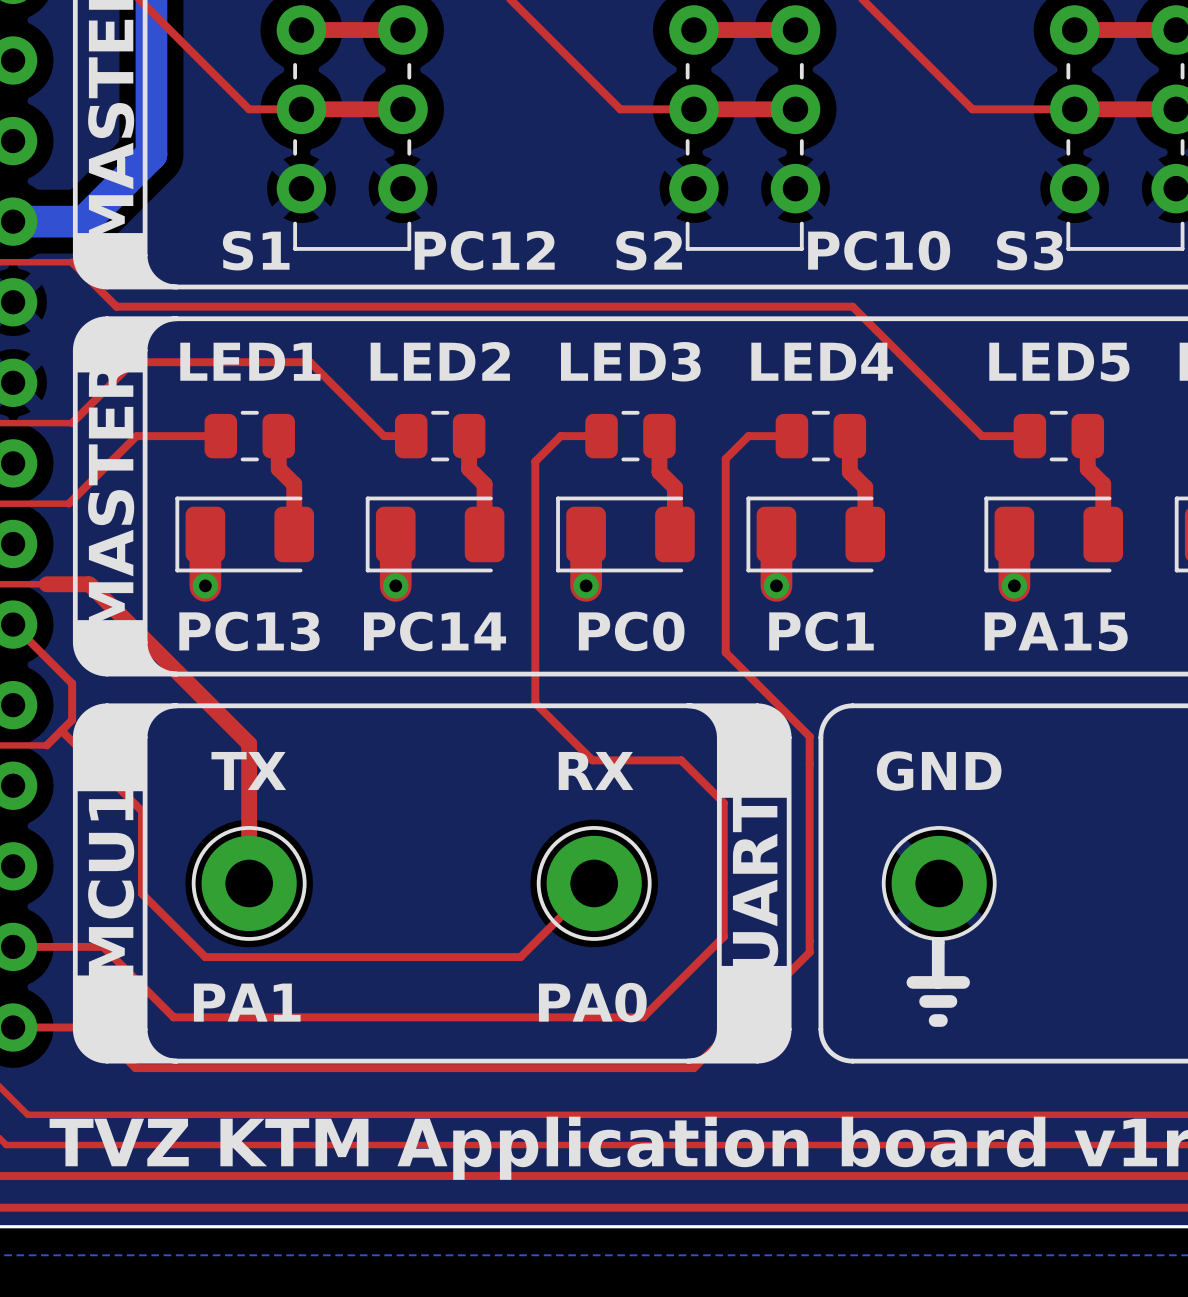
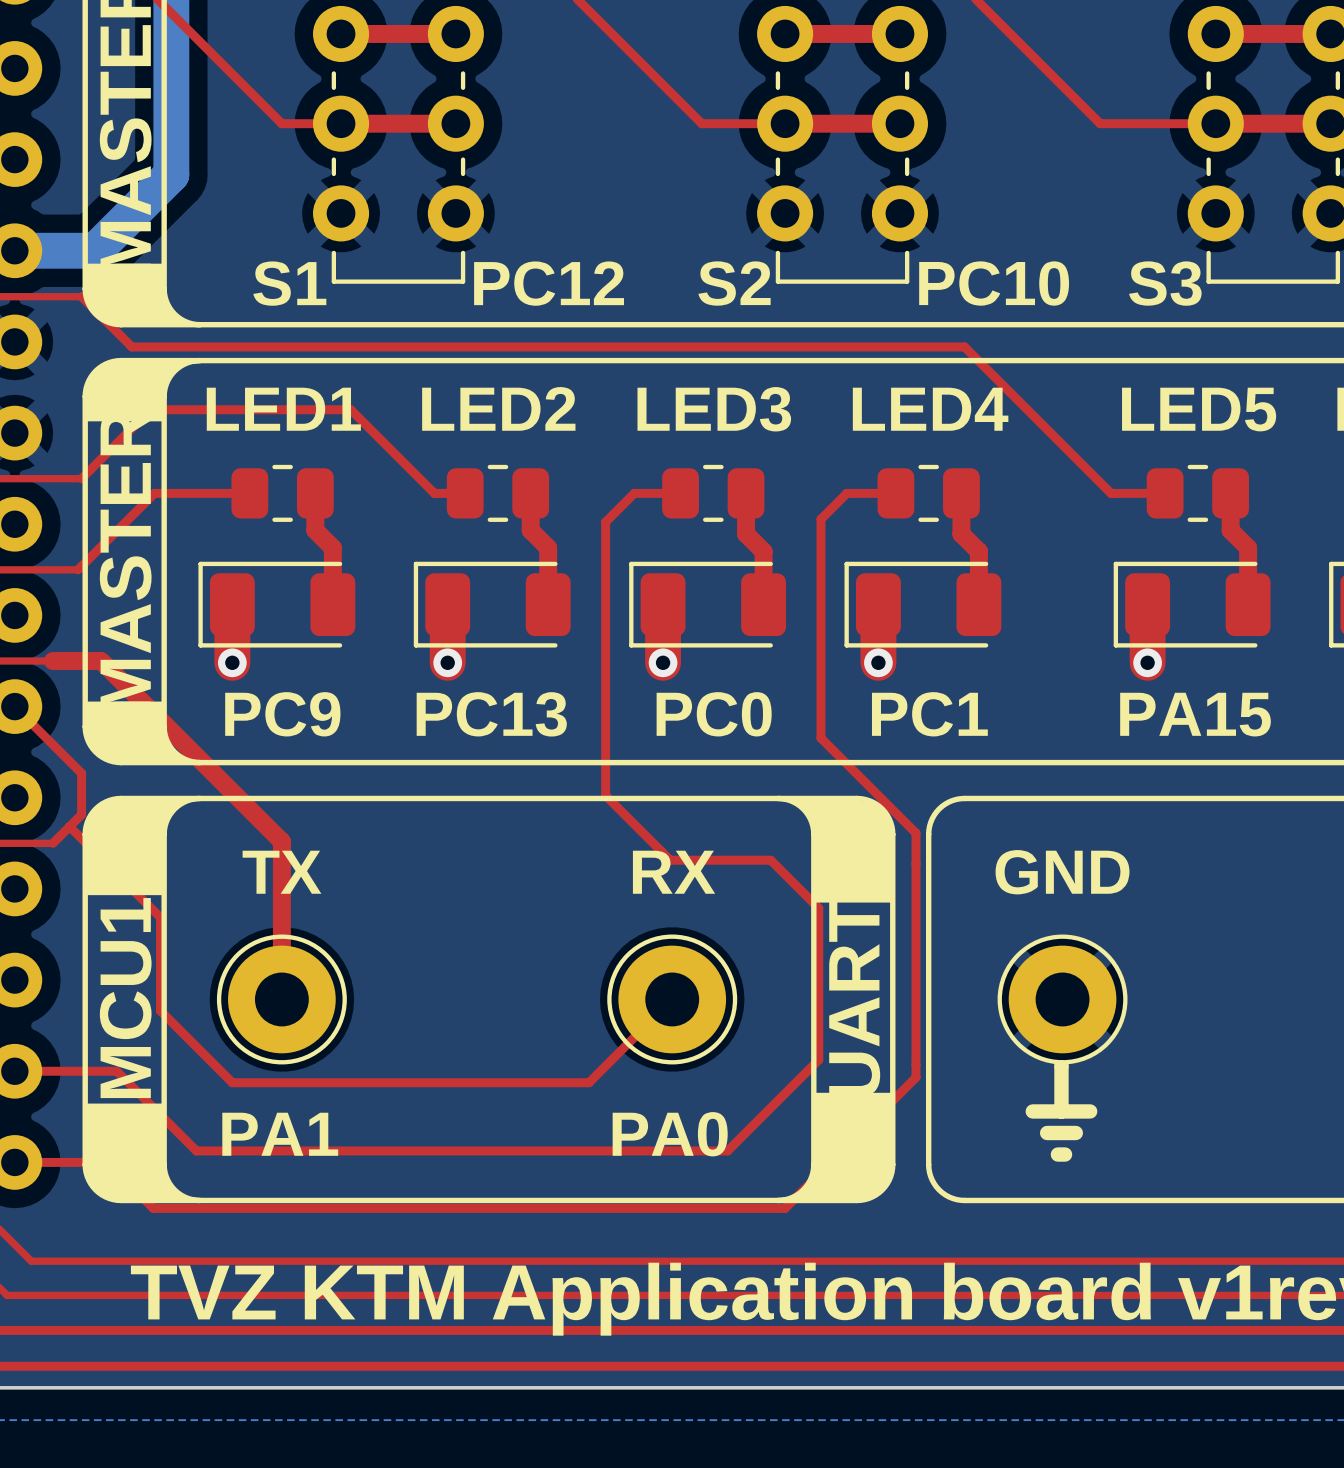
text: PC13 (249, 631) -> PC9 (282, 714)
text: PC14 (435, 631) -> PC13 (491, 714)

